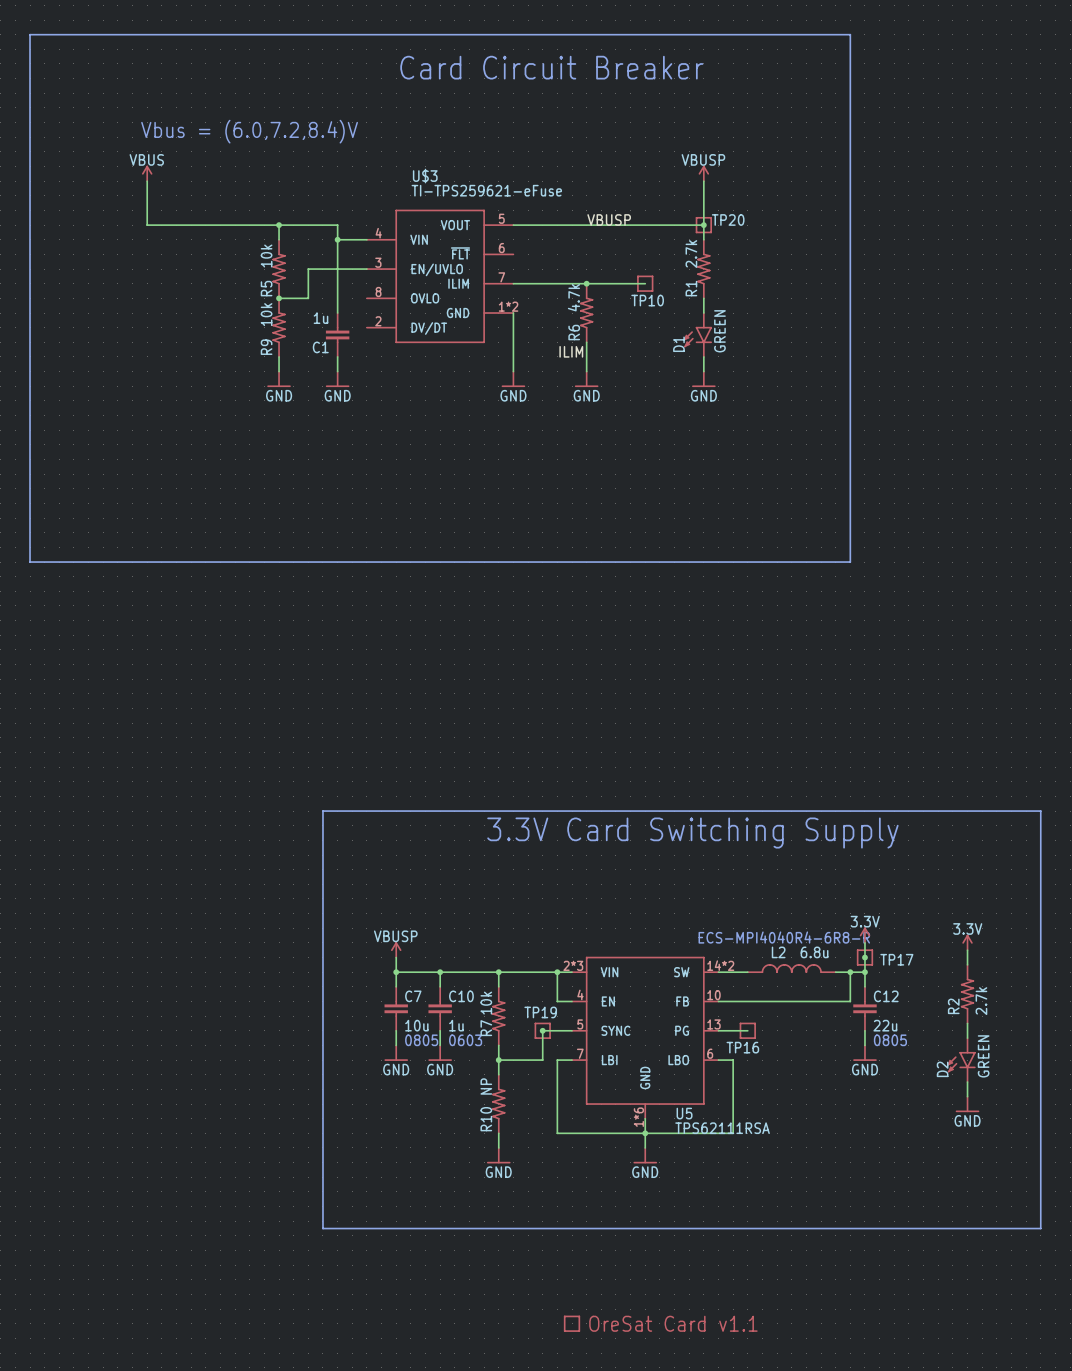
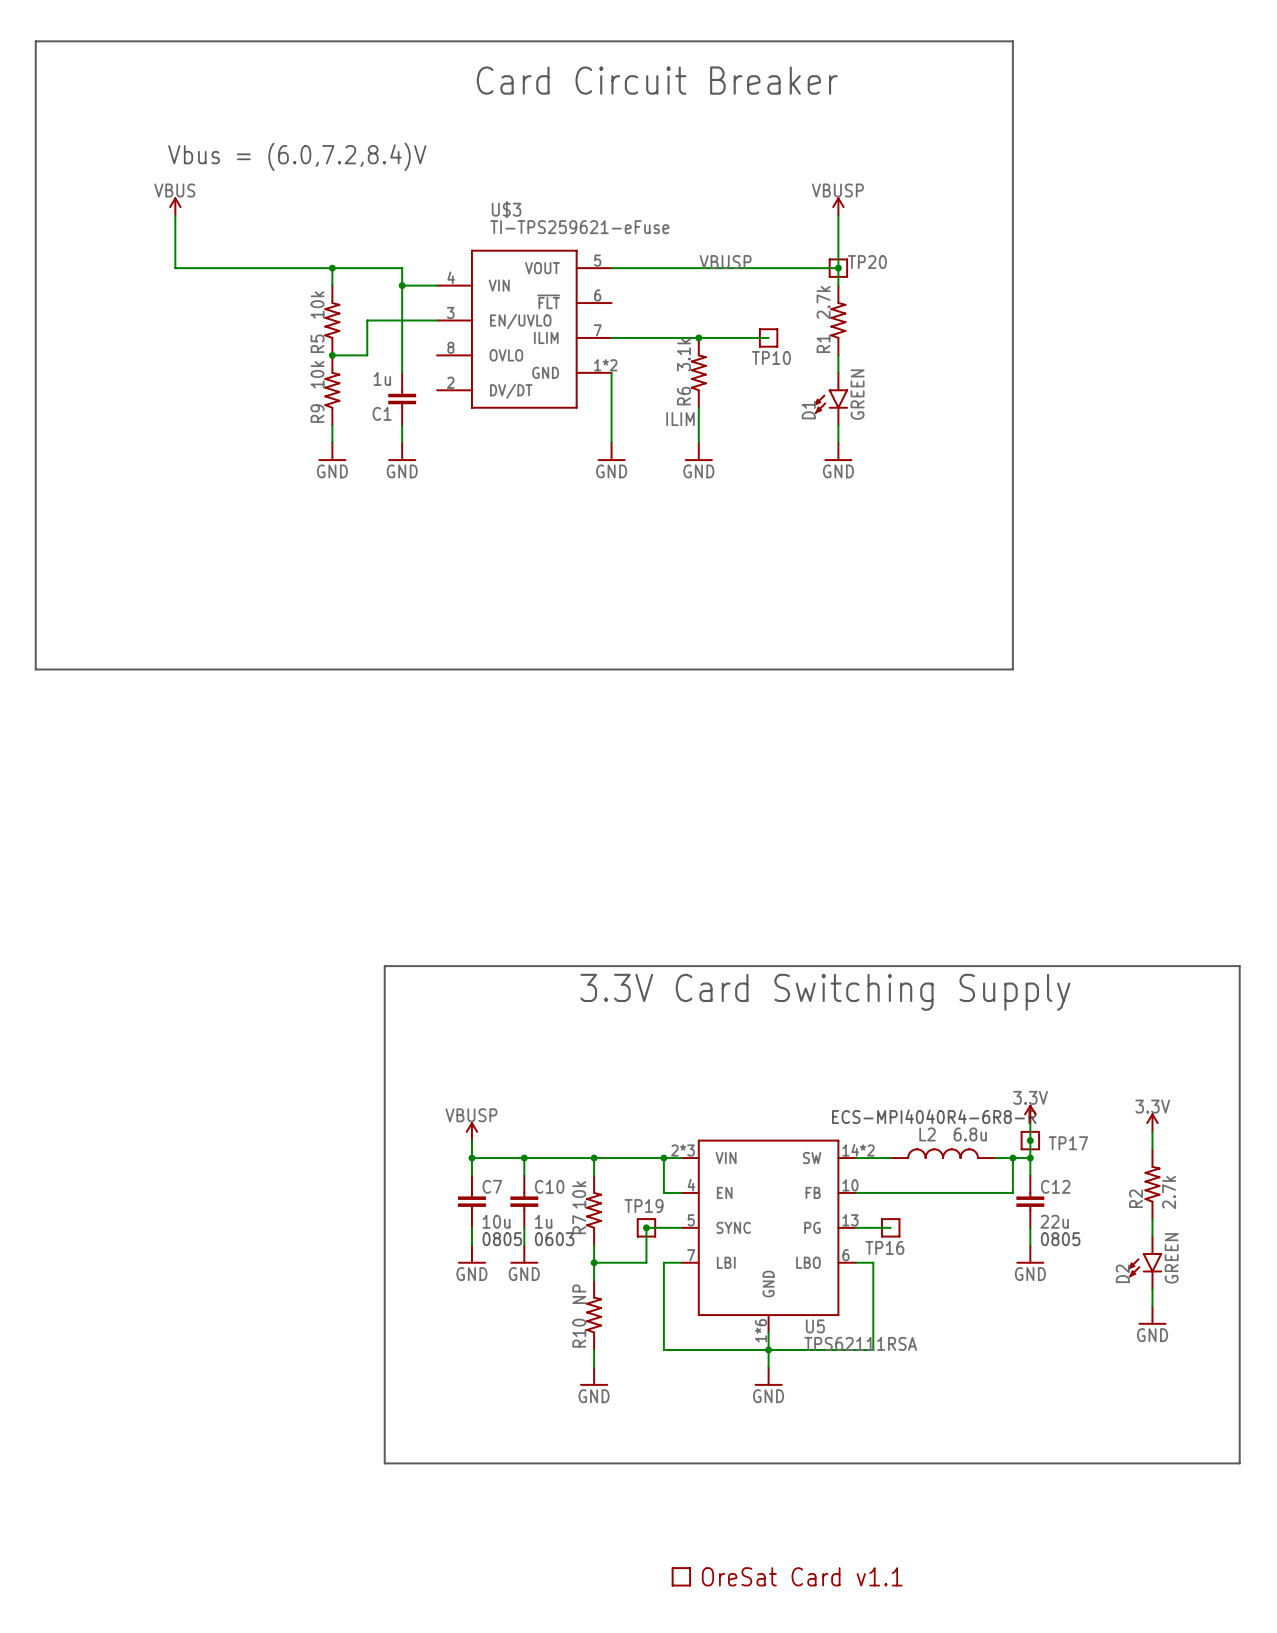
R6 value: 4.7k (573, 297) -> 3.1k (683, 354)

